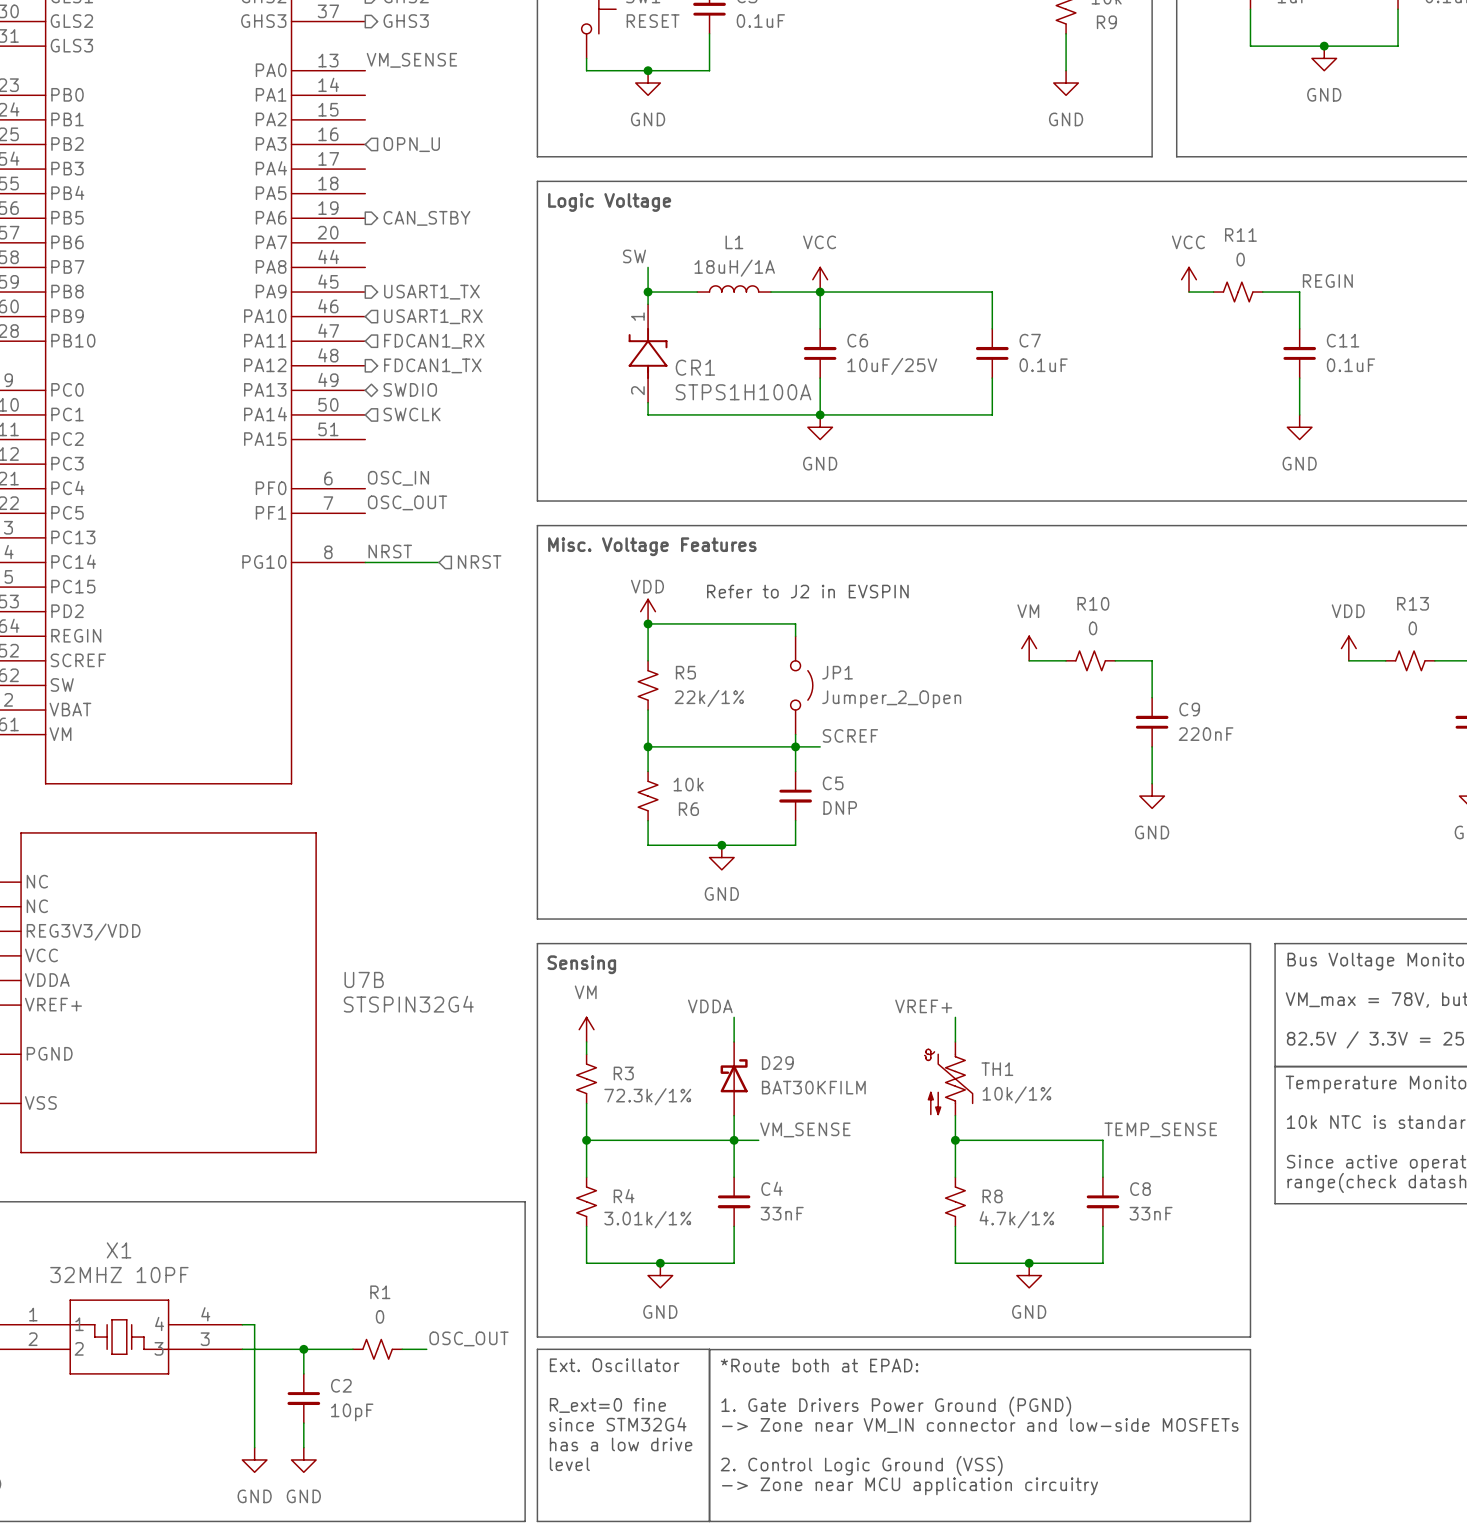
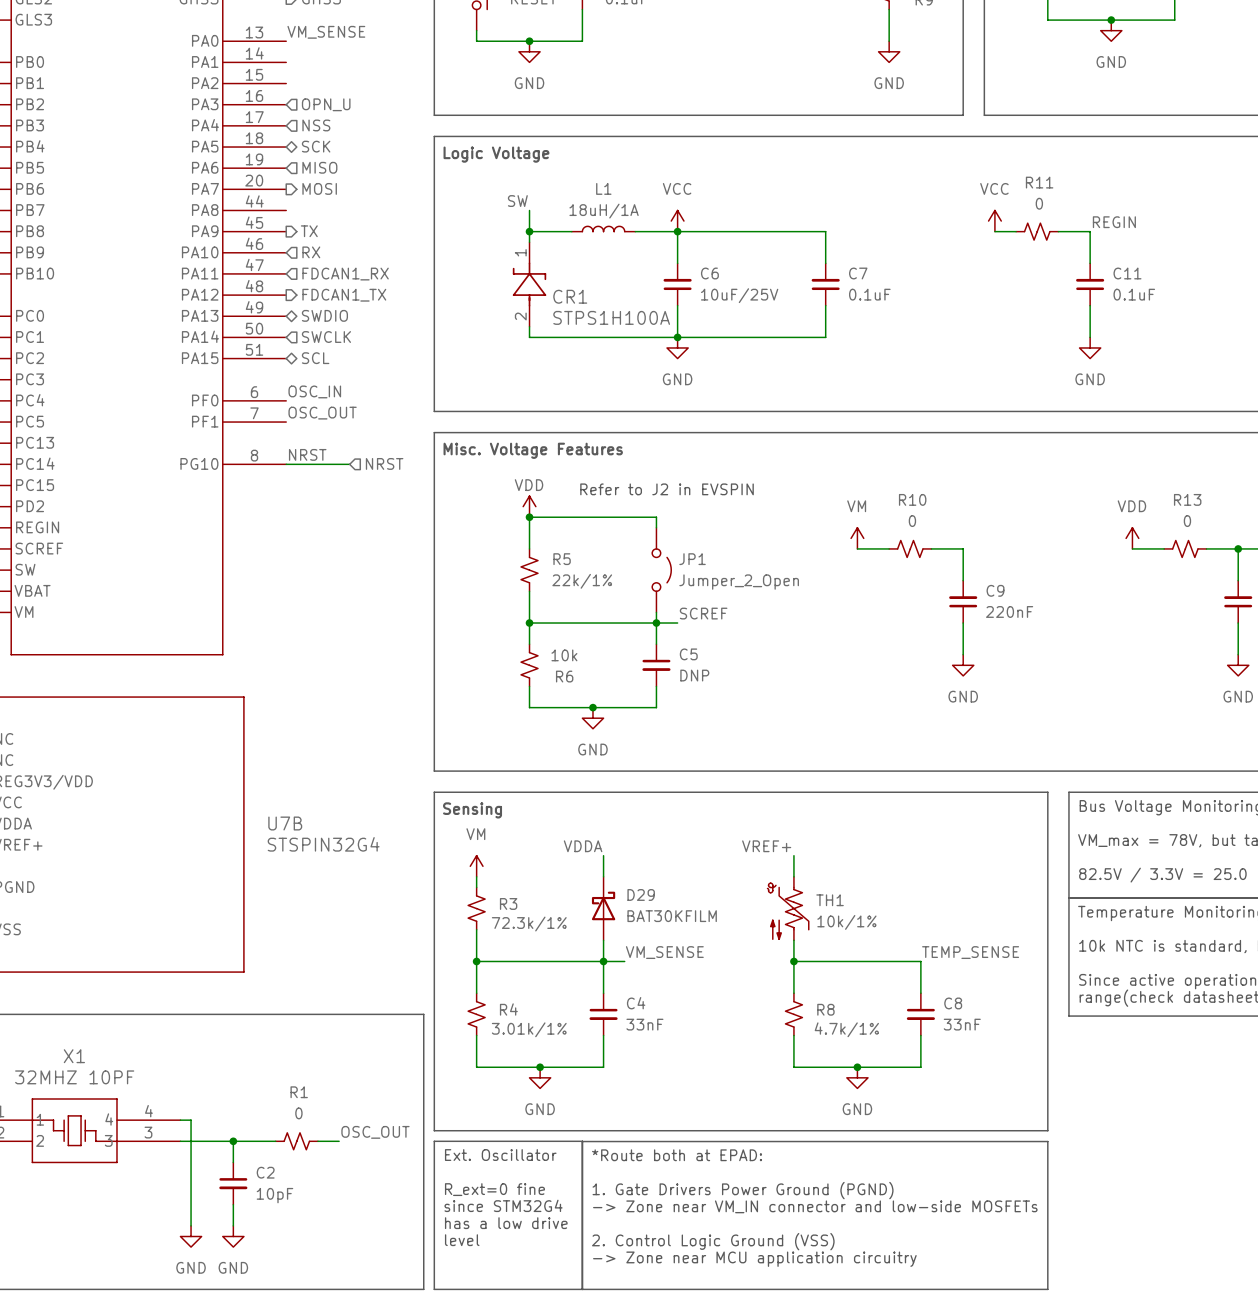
hierarchical label: none -> NSS (316, 125)
hierarchical label: none -> SCK (316, 146)
hierarchical label shape: output (426, 218) -> input (319, 167)
hierarchical label: CAN_STBY (426, 218) -> MISO (319, 167)
hierarchical label: none -> MOSI (319, 188)
hierarchical label: USART1_TX (431, 292) -> TX (309, 231)
hierarchical label: USART1_RX (433, 316) -> RX (311, 252)
hierarchical label: none -> SCL (315, 358)

